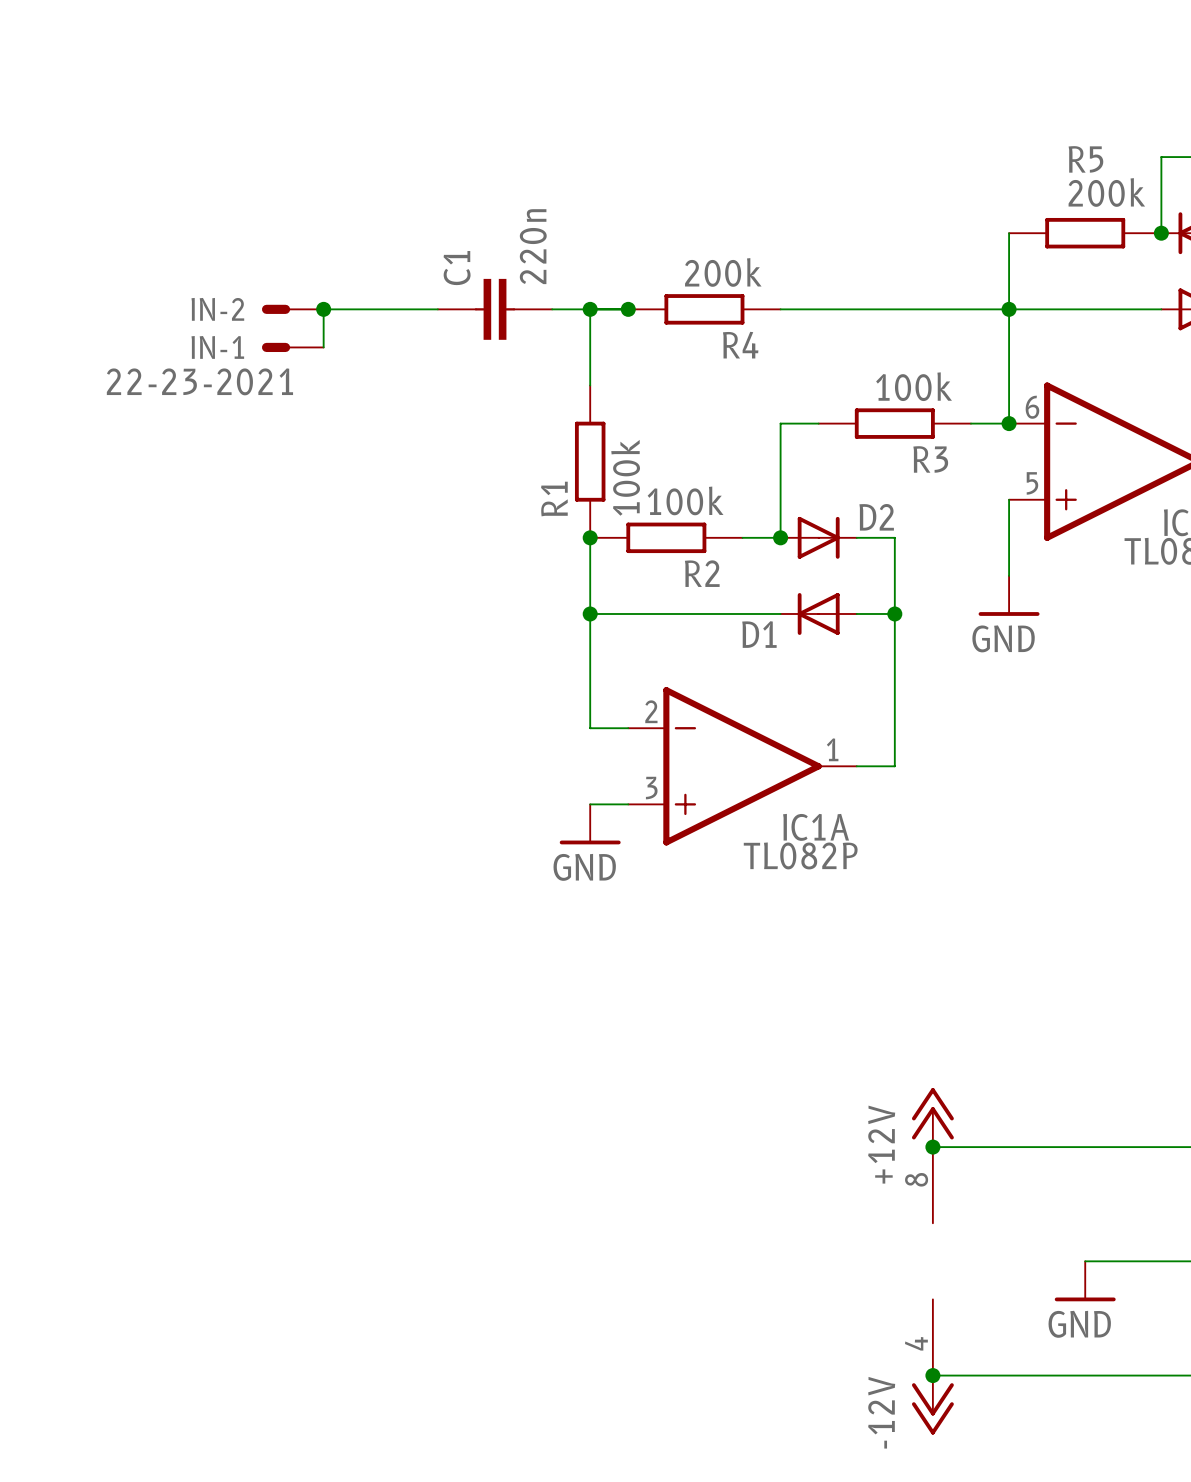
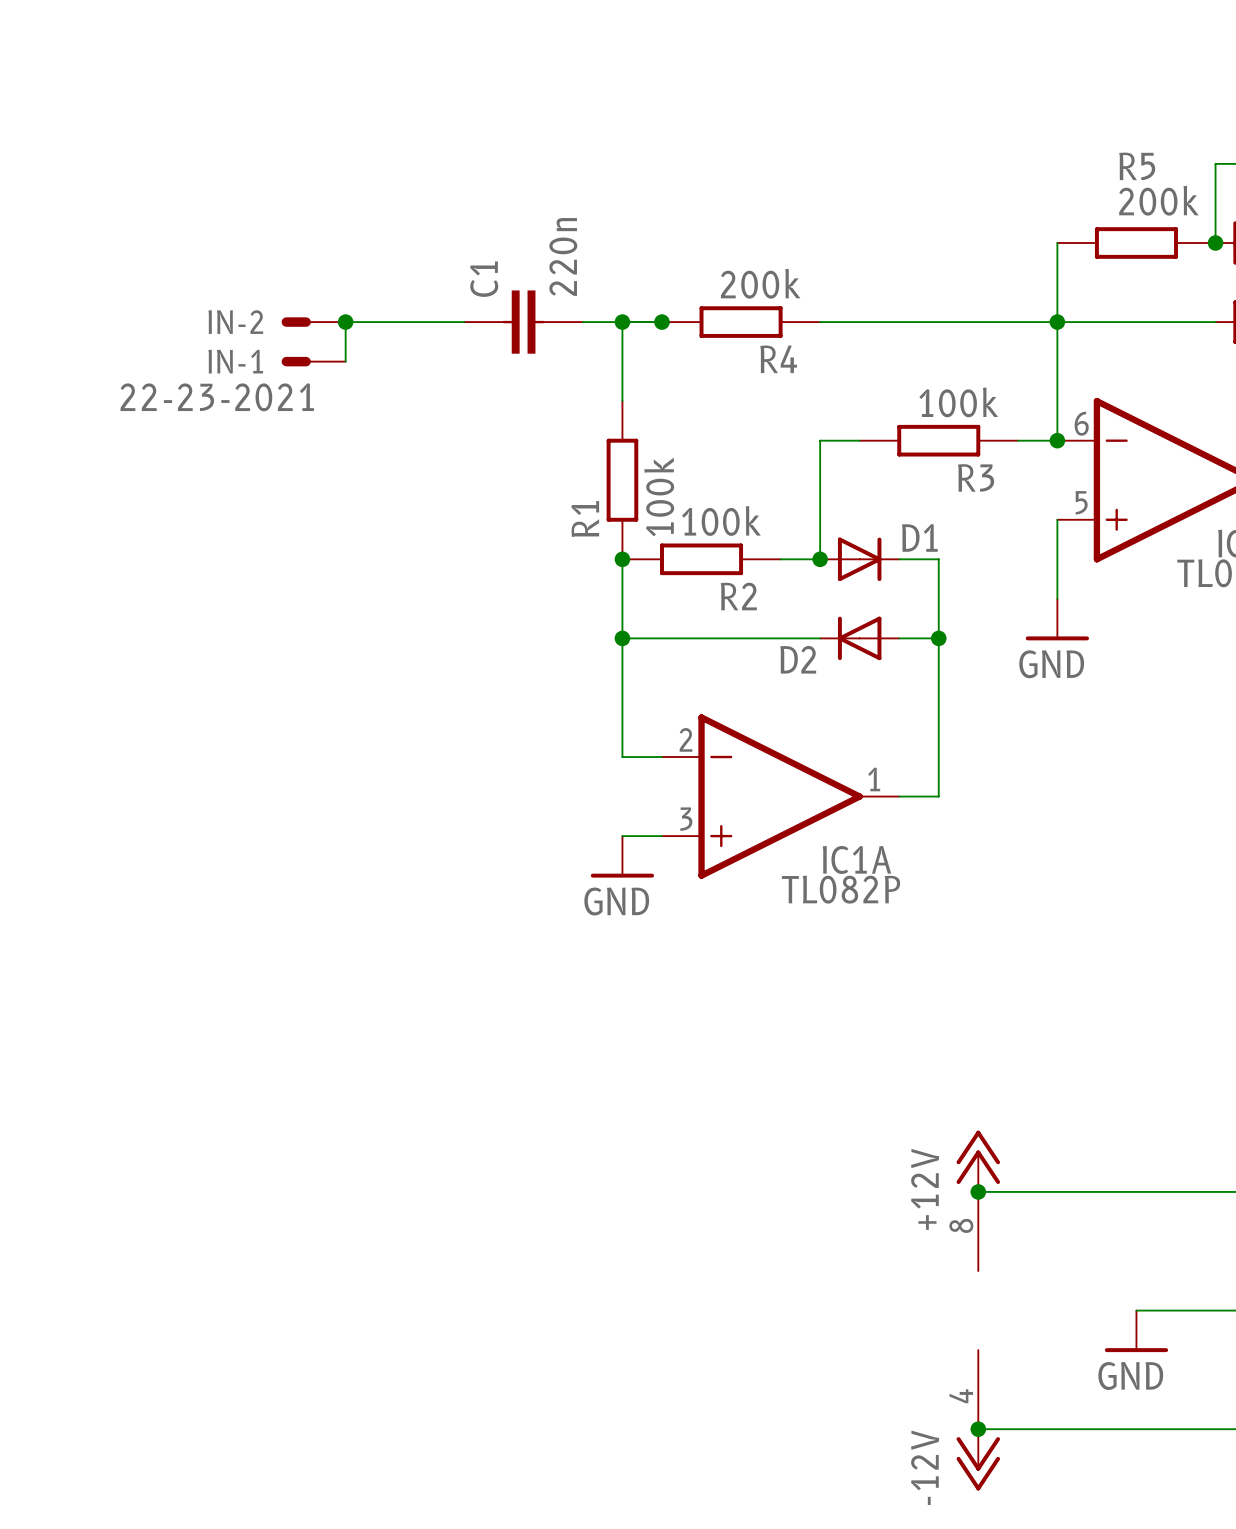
D2 name: D2 (876, 517) -> D1 (919, 537)
D1 name: D1 (759, 634) -> D2 (798, 659)

